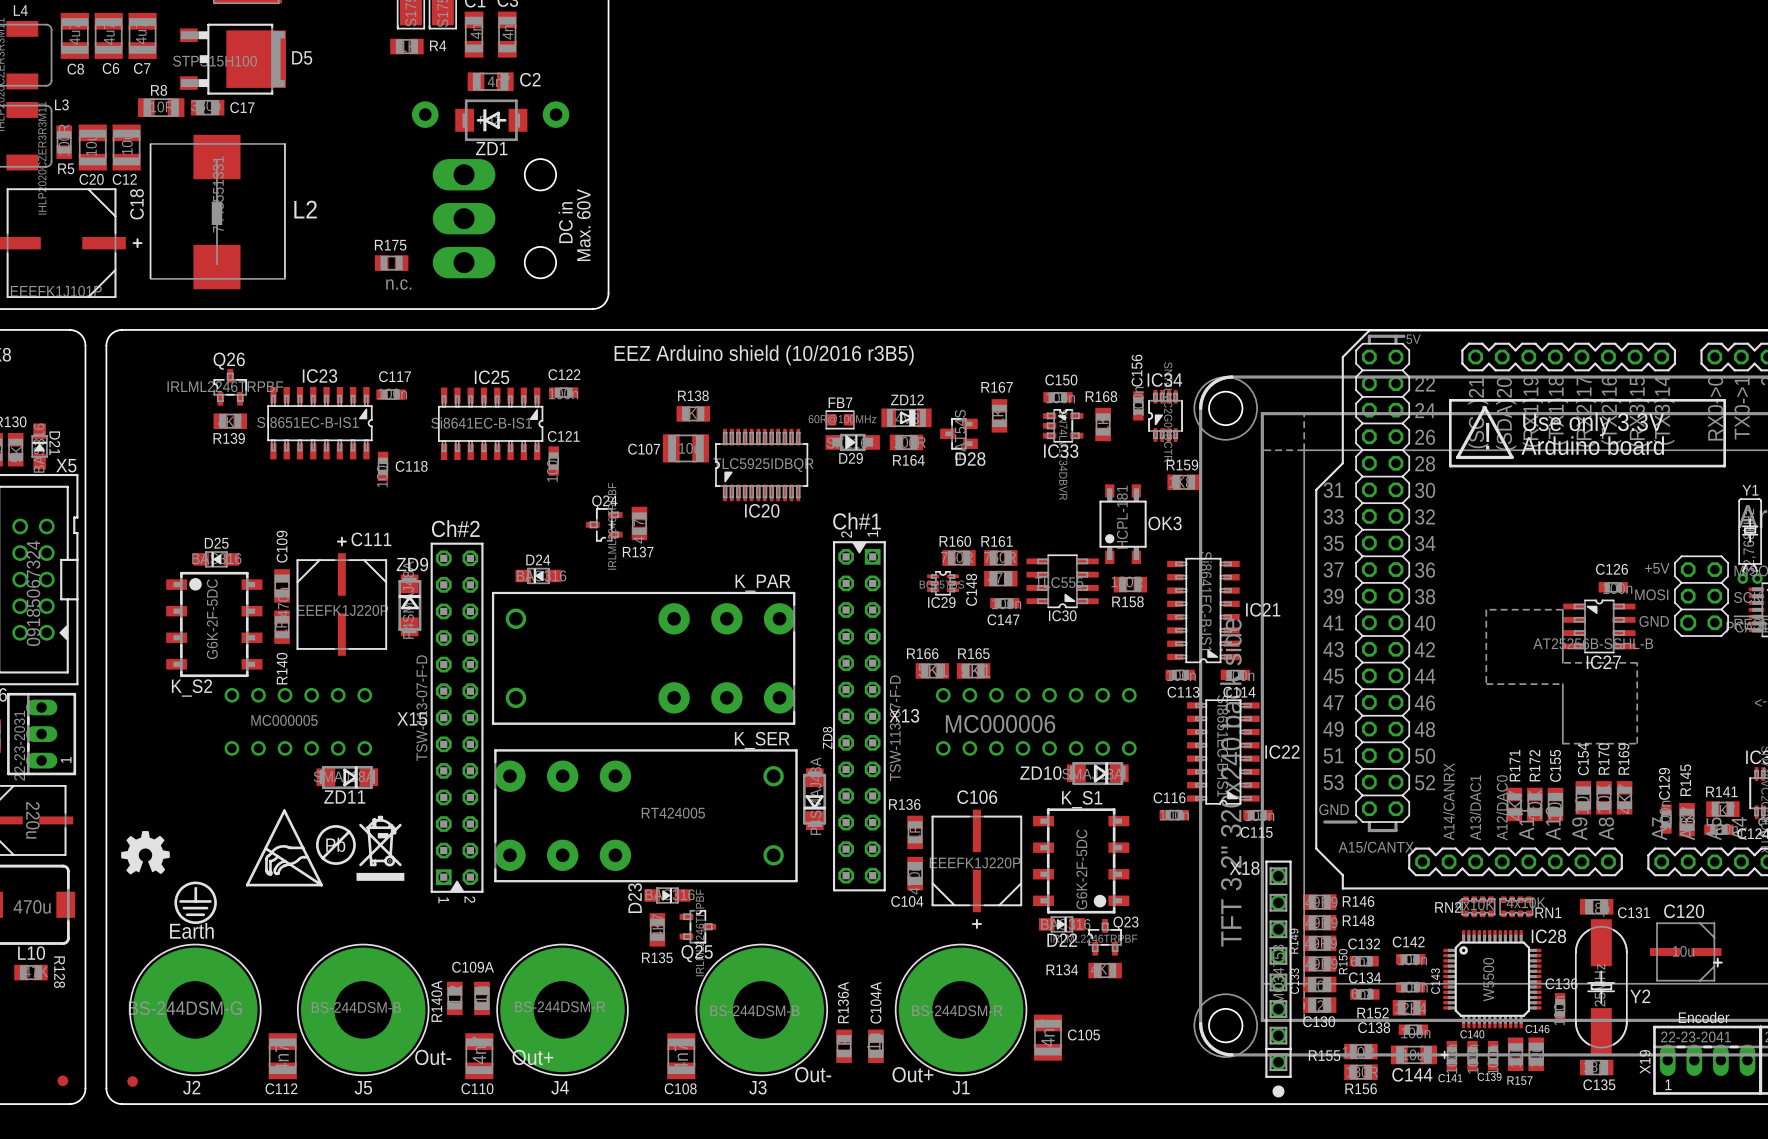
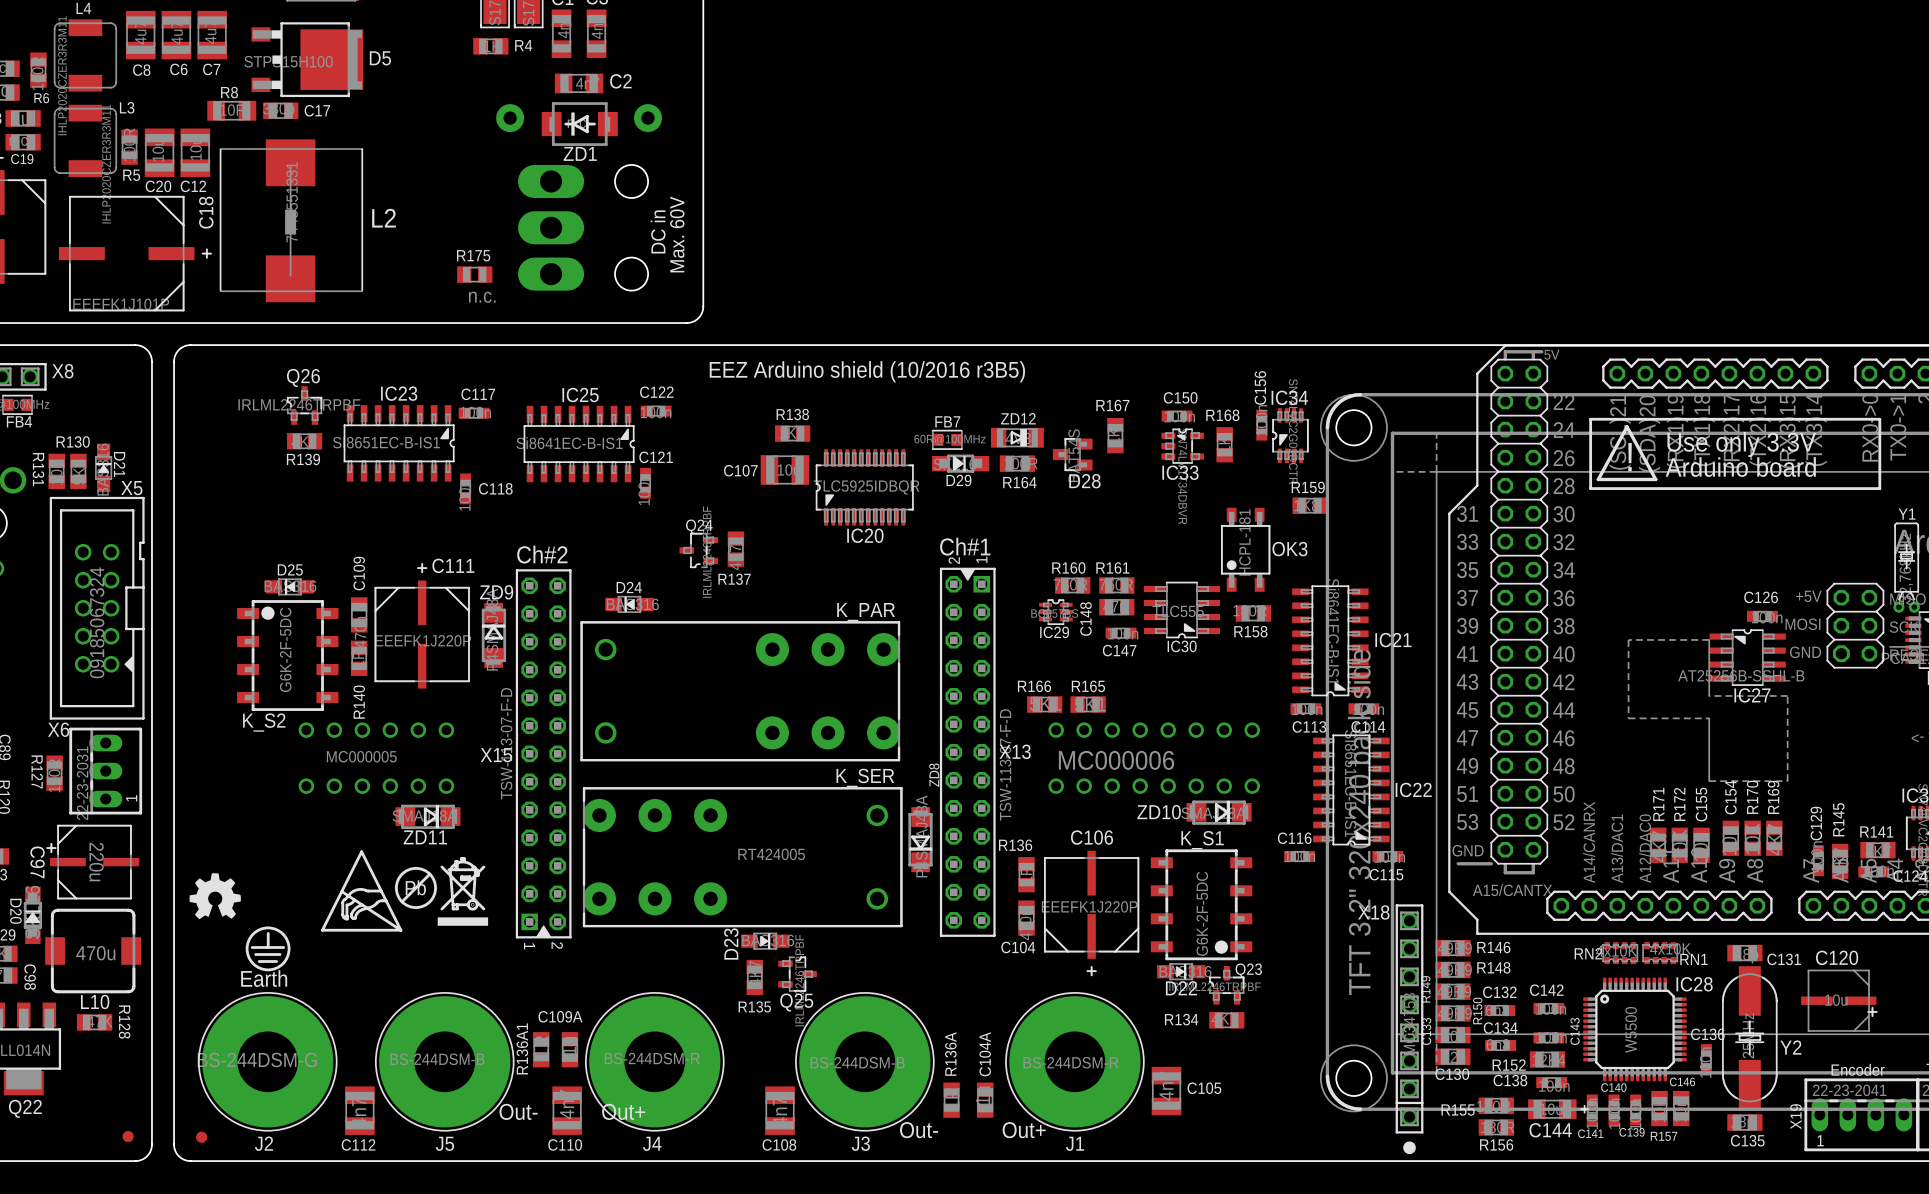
R140A name: R140A (436, 1001) -> R136A1 (522, 1048)

